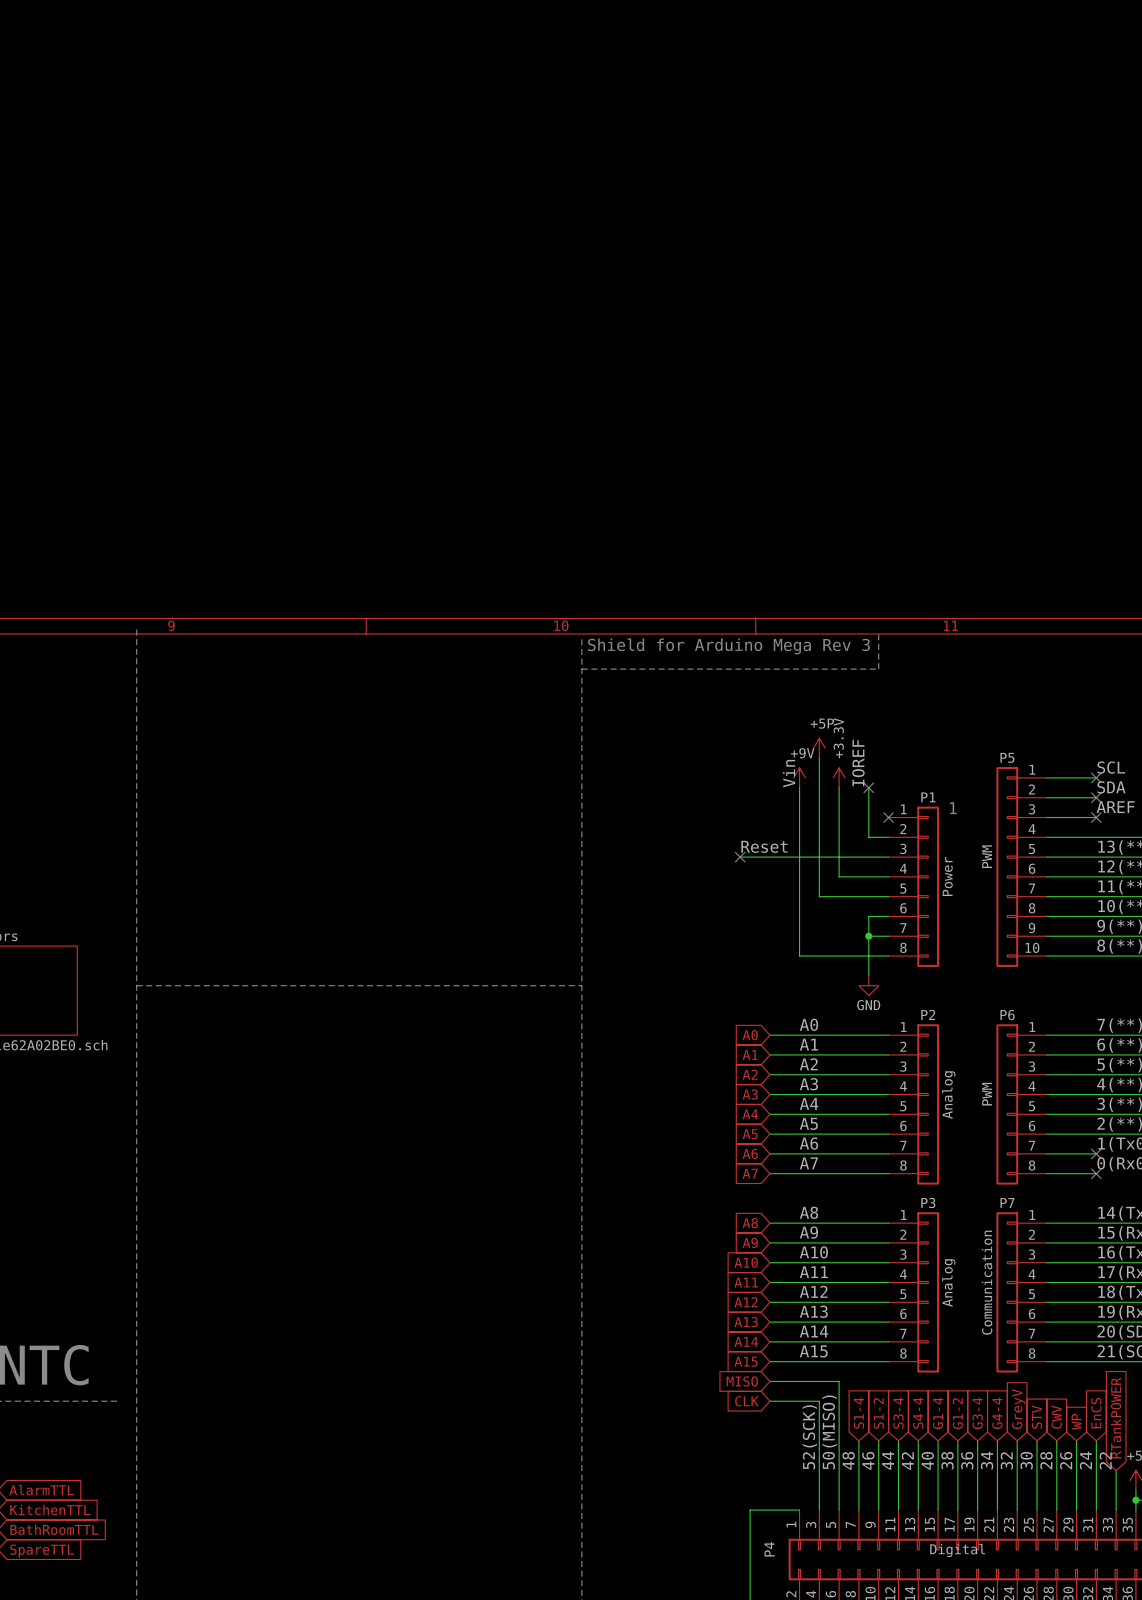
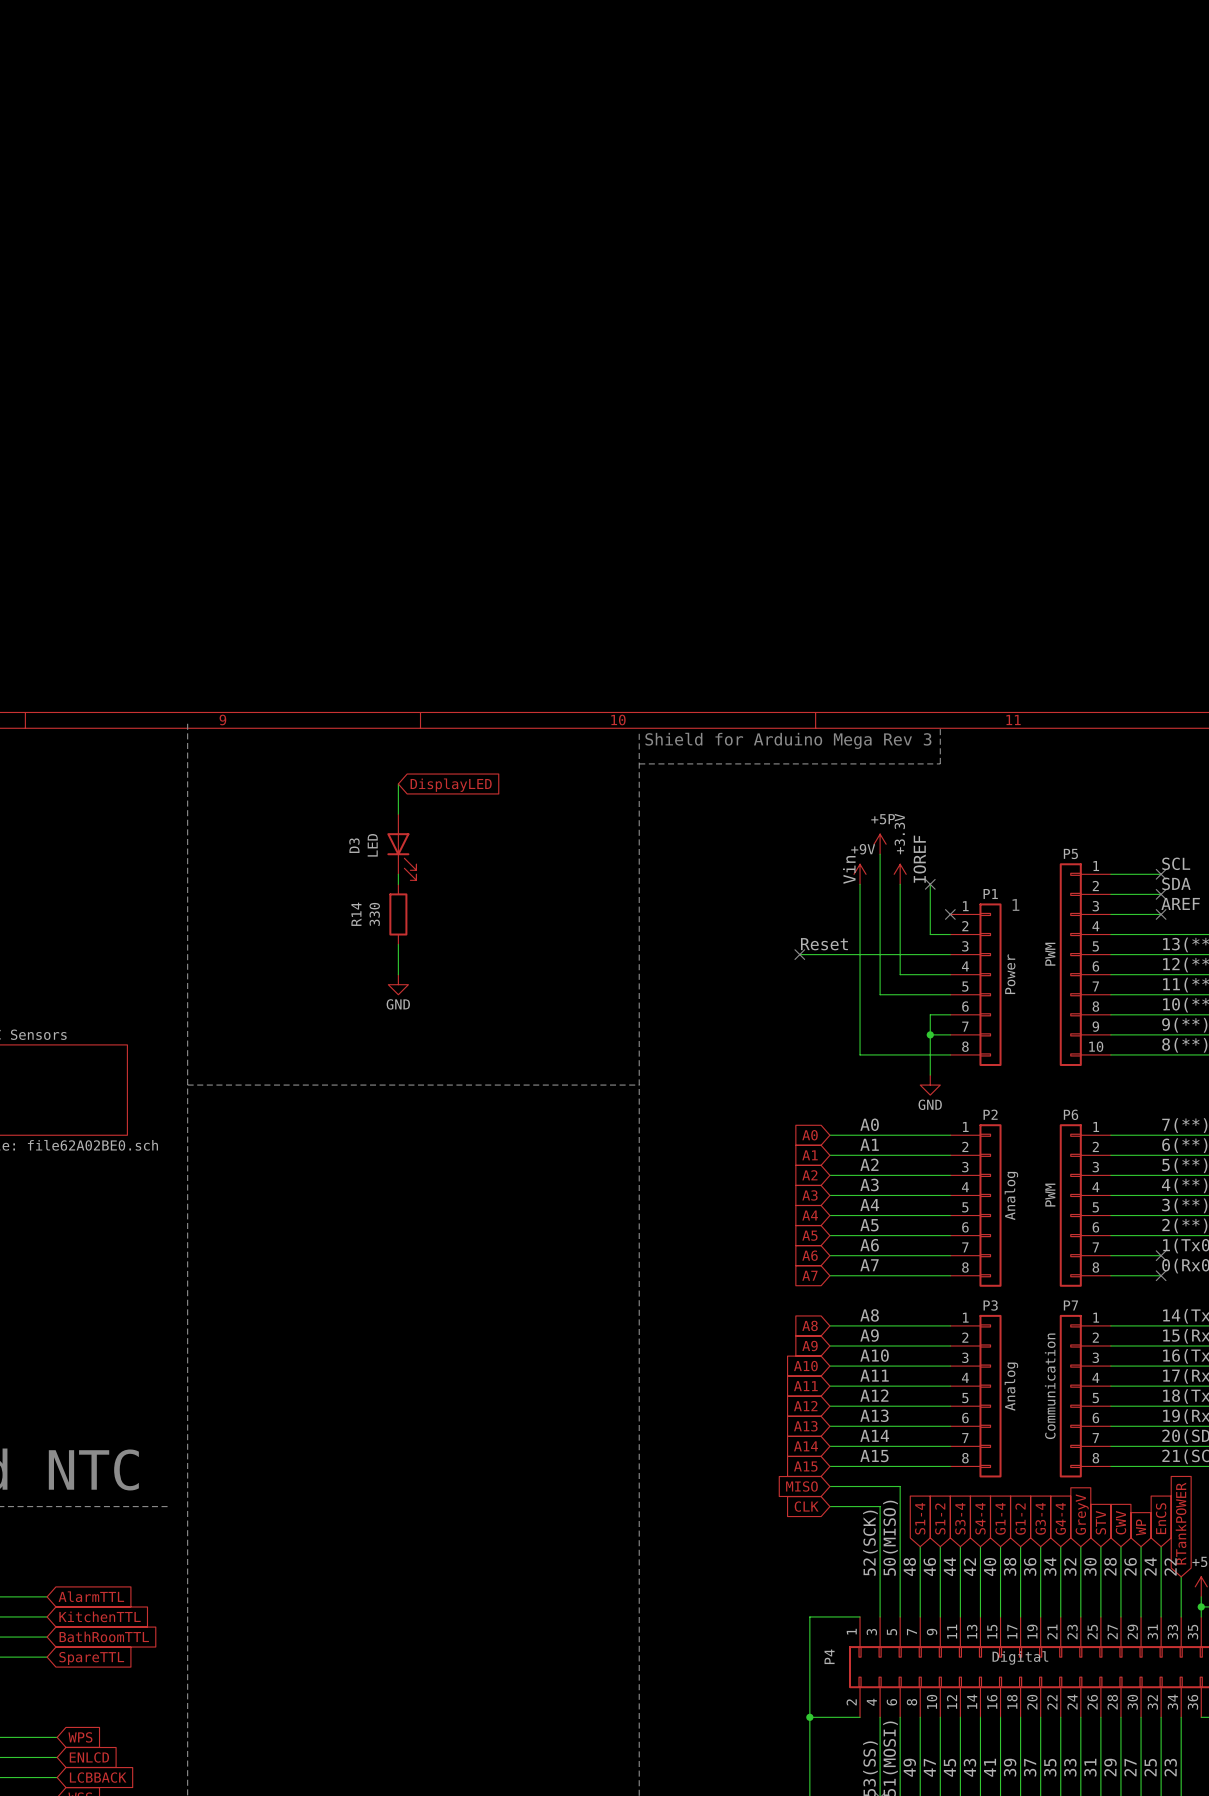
wire: none -> (398, 783) (398, 814)
global label: none -> DisplayLED (451, 785)
D3: none -> LED (401, 847)
wire: none -> (398, 874) (398, 884)
R14: none -> 330 (398, 914)
wire: none -> (398, 944) (398, 974)
power symbol: none -> GND (398, 984)

